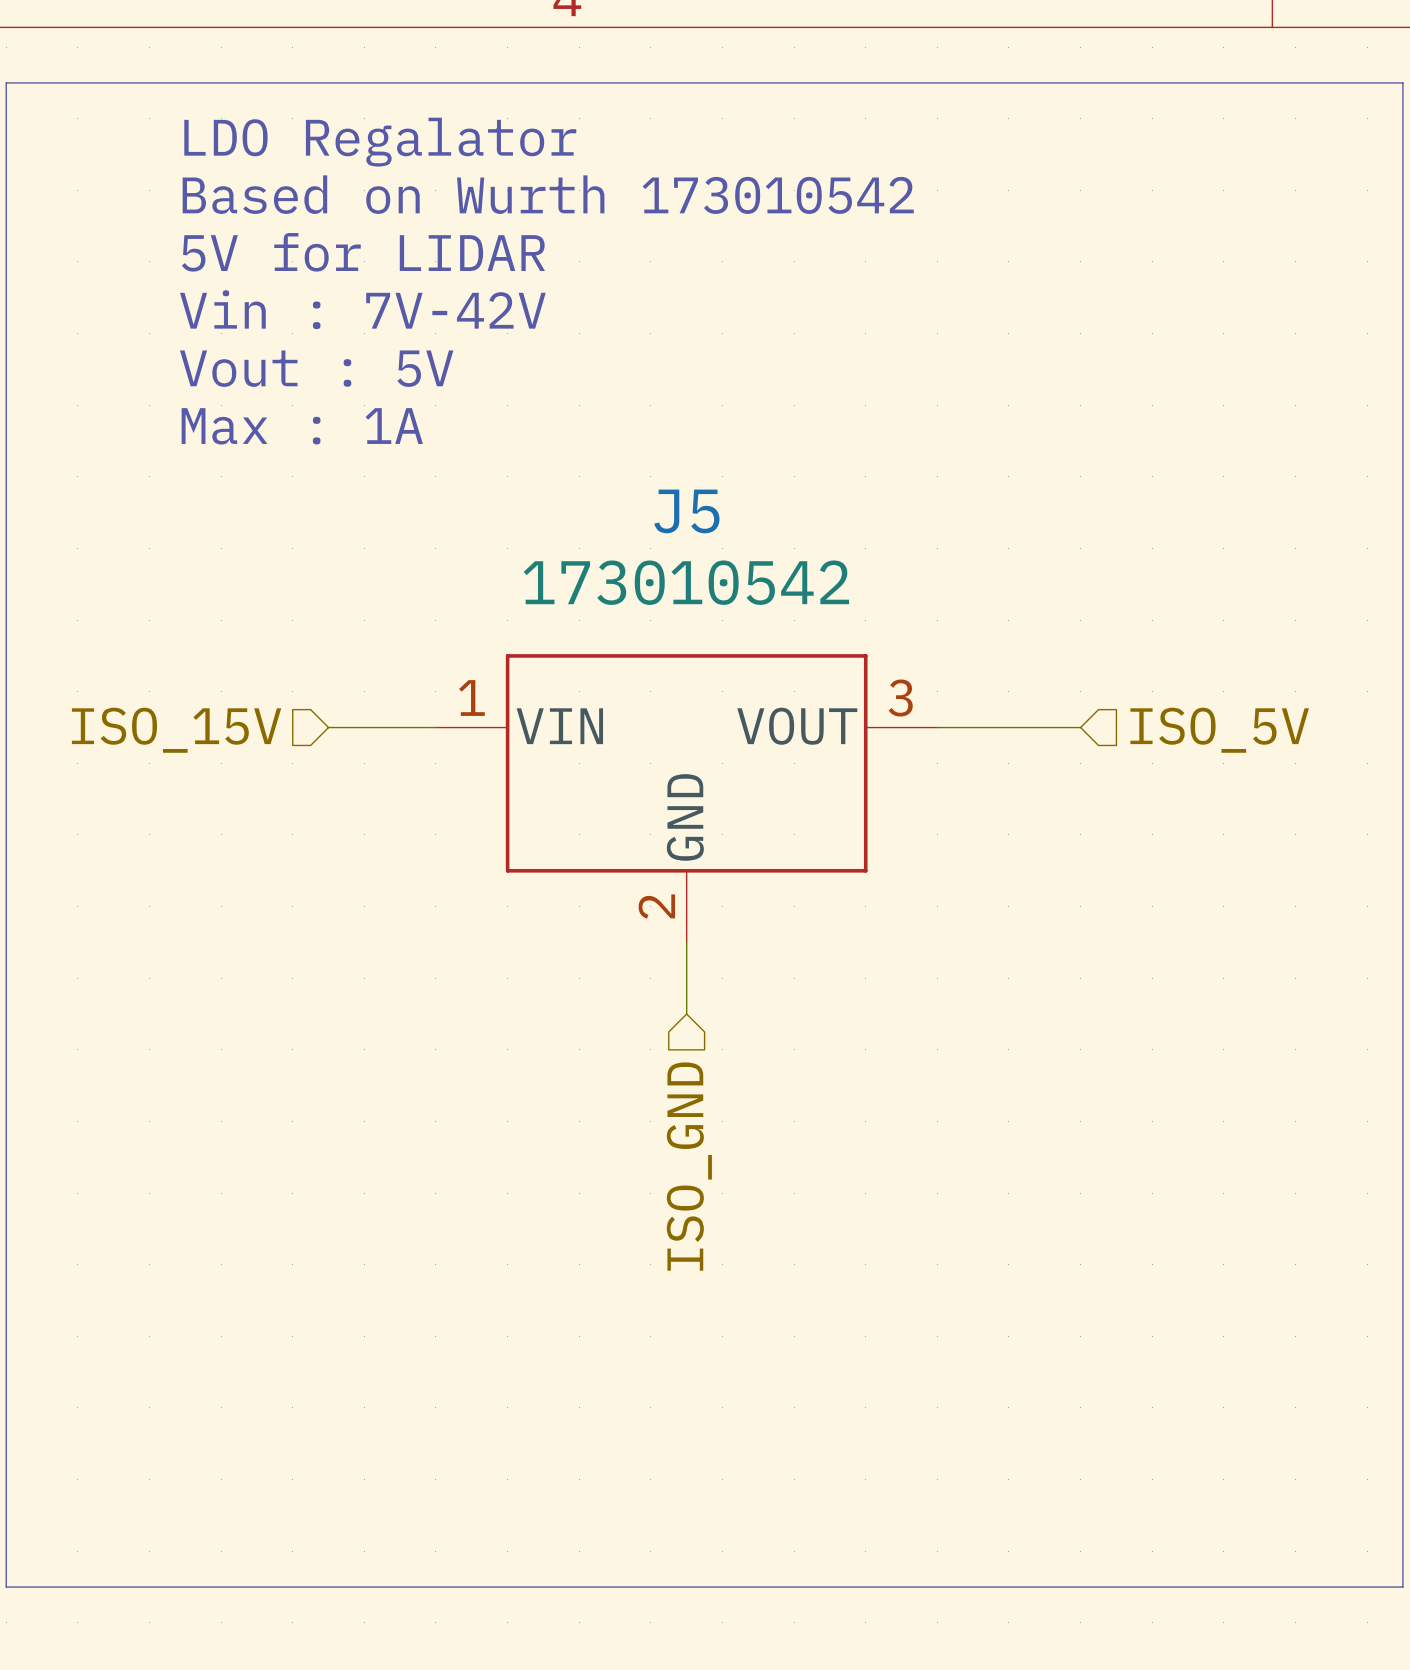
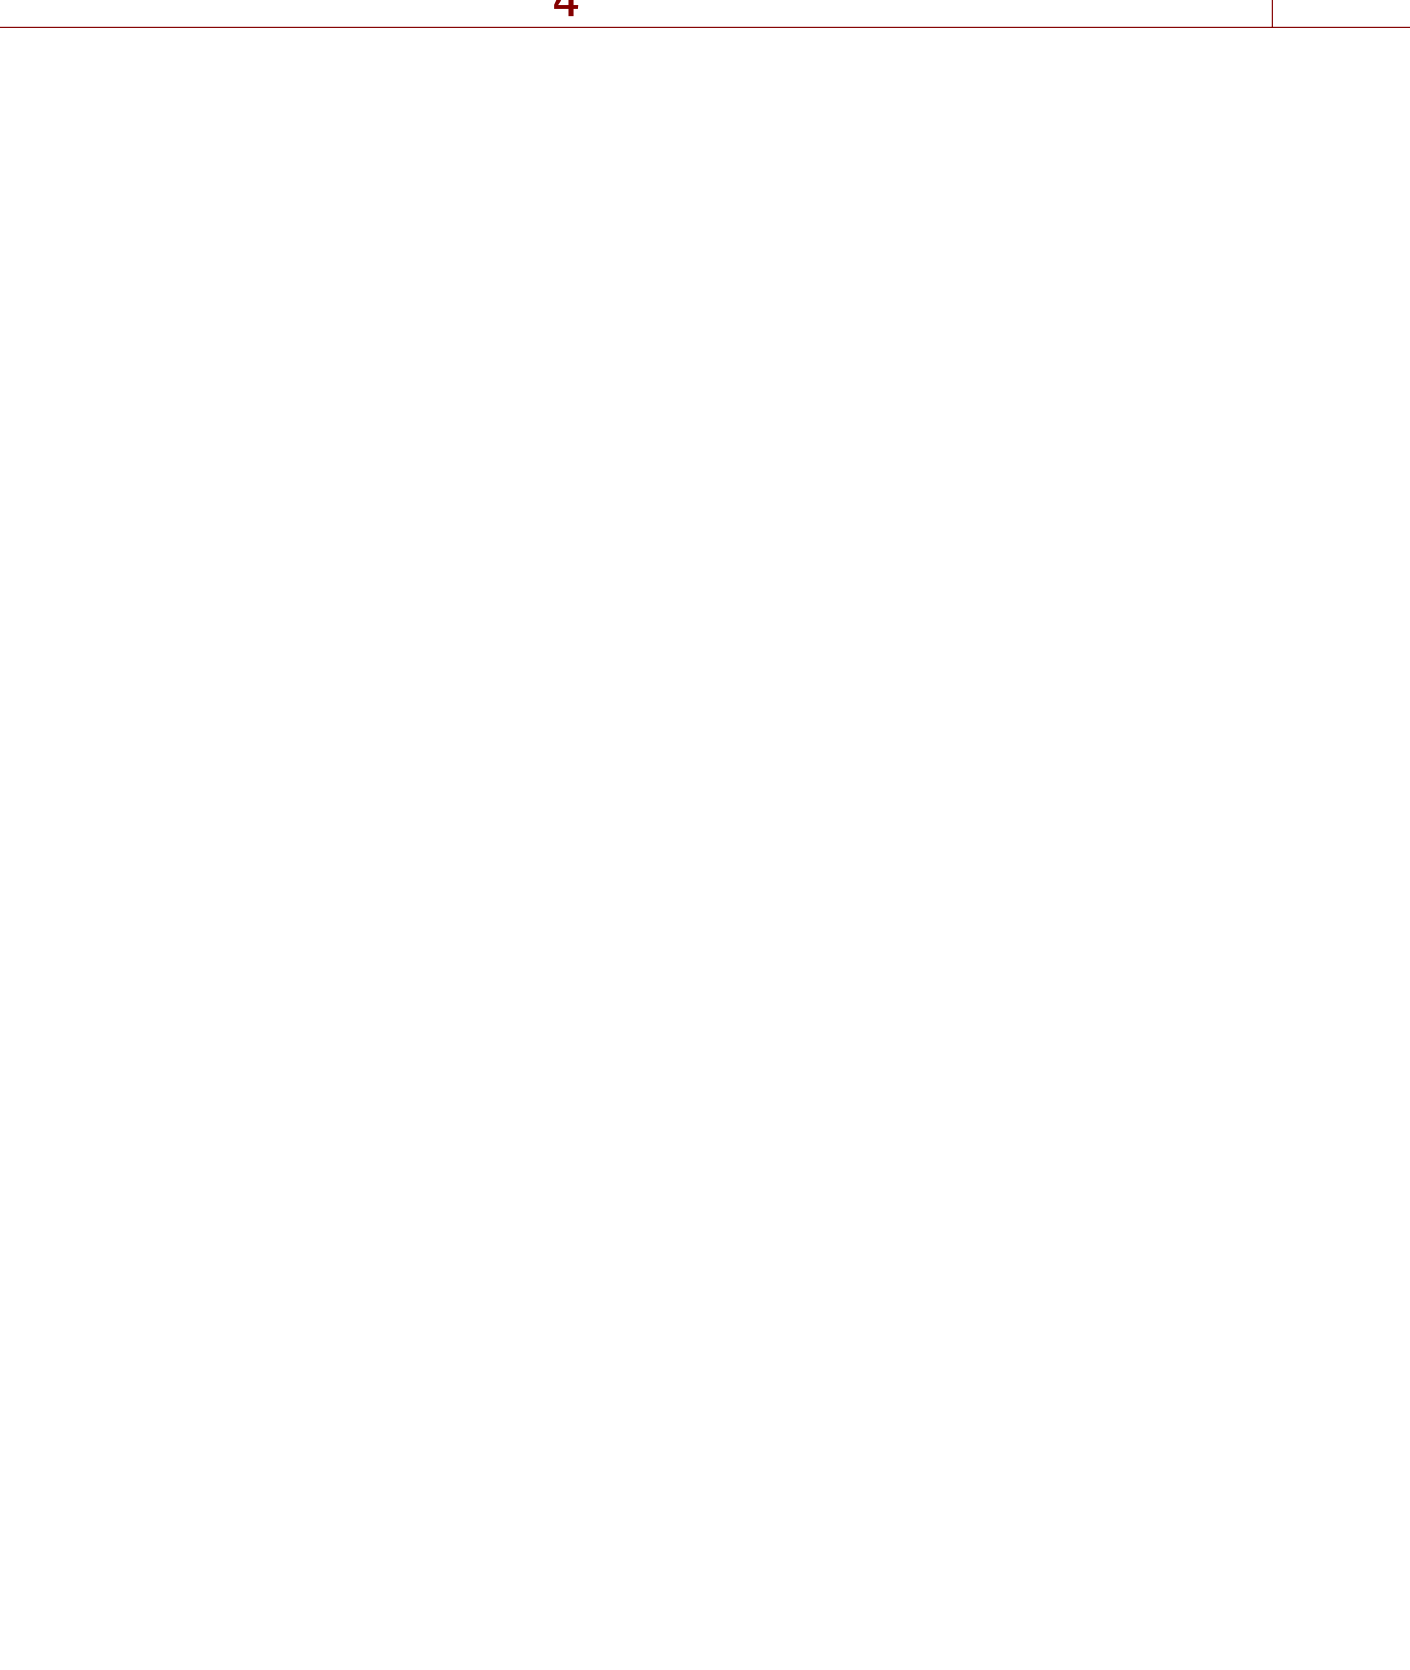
line: (6, 82) (1402, 82) (1402, 1587) (6, 1587) (6, 82) -> none
text: LDO Regalator (380, 142) -> none
text: Based on Wurth 173010542 (548, 194) -> none
text: 5V for LIDAR (363, 252) -> none
text: Vin : 7V-42V (362, 309) -> none
text: Vout : 5V (316, 368) -> none
text: Max : 1A (302, 426) -> none
wire: (328, 727) (435, 727) -> none
wire: (937, 727) (1080, 727) -> none
hierarchical label: ISO_15V (176, 730) -> none
hierarchical label: ISO_5V (1219, 730) -> none
J5: 173010542 (686, 798) -> none
wire: (686, 942) (686, 1014) -> none
hierarchical label: ISO_GND (689, 1166) -> none

